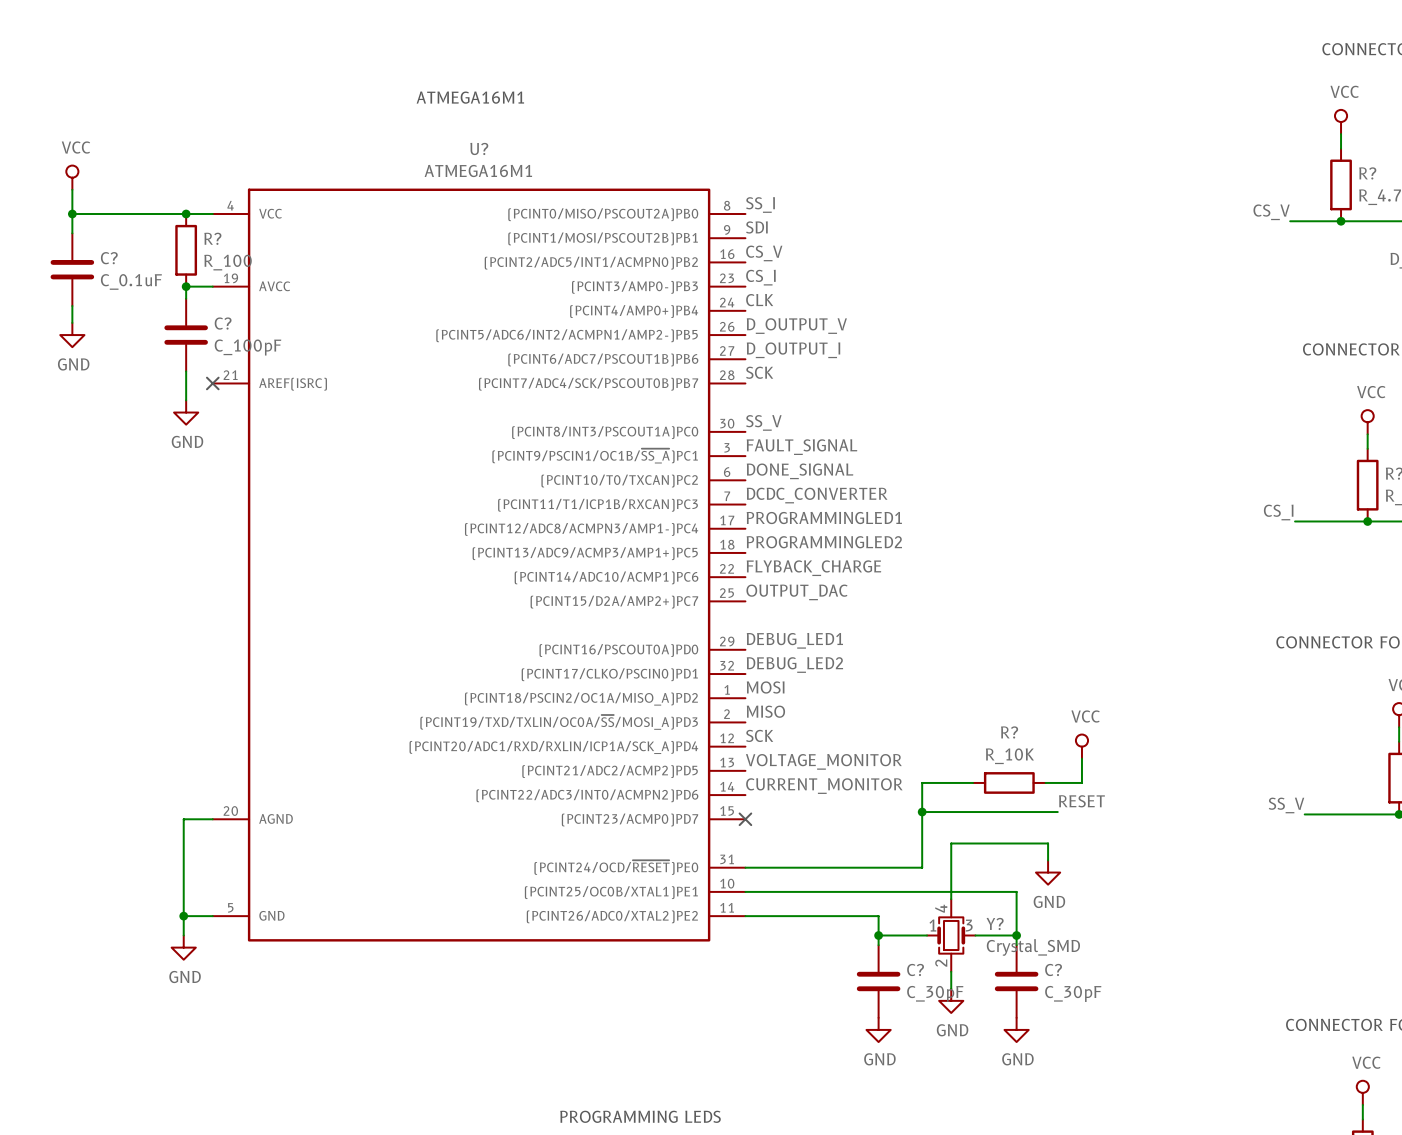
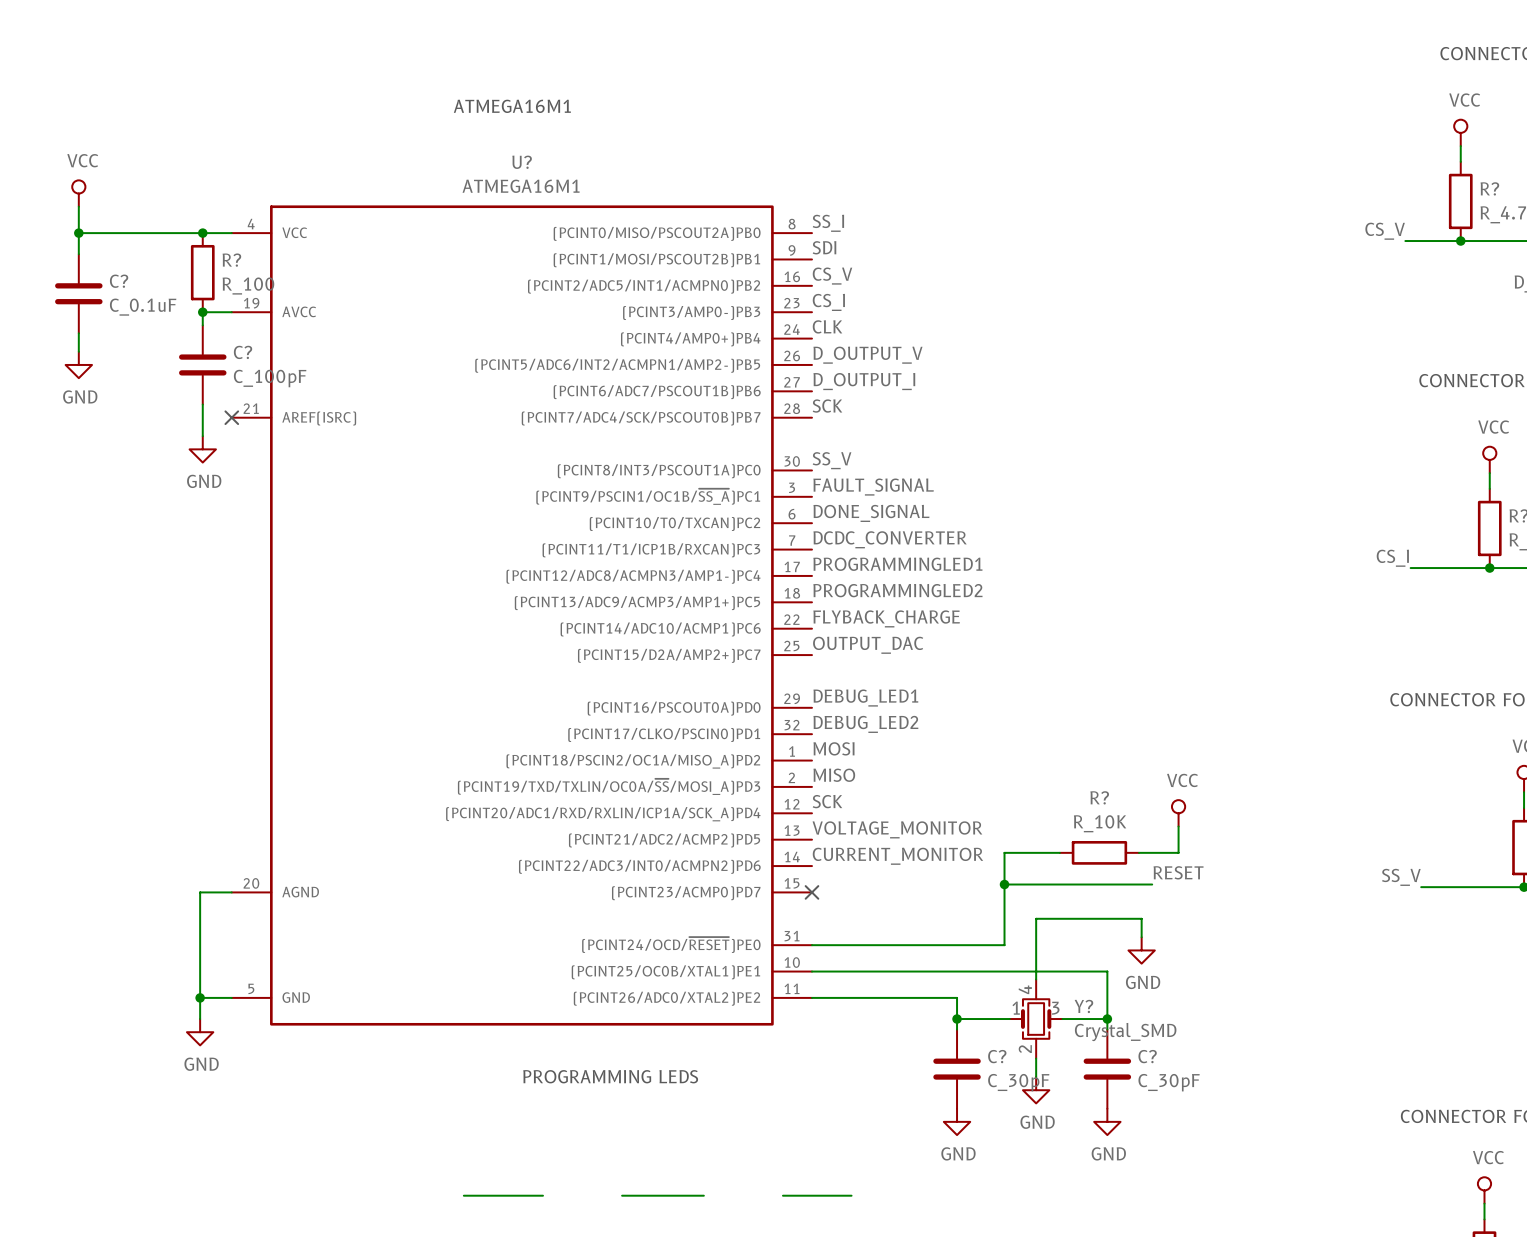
wire: none -> (463, 1195) (542, 1195)
wire: none -> (622, 1195) (703, 1195)
wire: none -> (782, 1195) (851, 1195)
text position: PROGRAMMING LEDS (640, 1116) -> PROGRAMMING LEDS (610, 1076)

